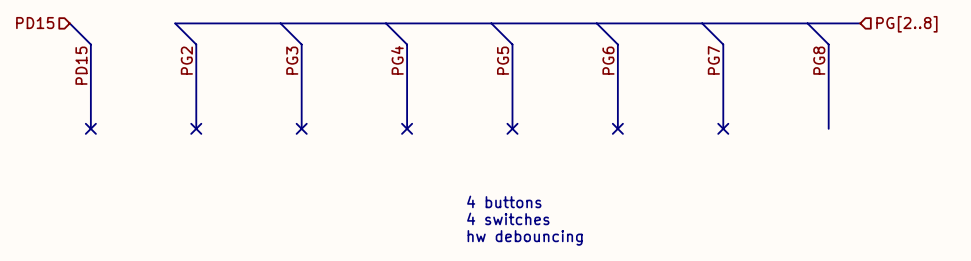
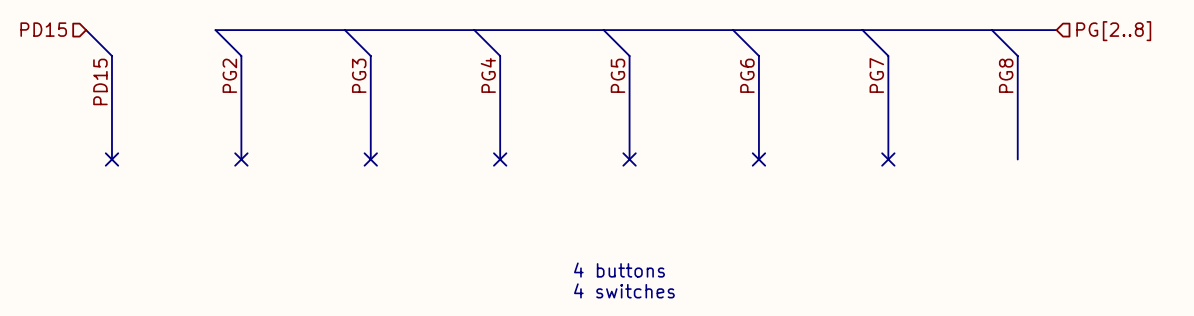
text: 4 buttons (504, 201) -> none
text: 4 switches (508, 218) -> 4 buttons (619, 270)
text: hw debouncing (525, 237) -> 4 switches (624, 290)

